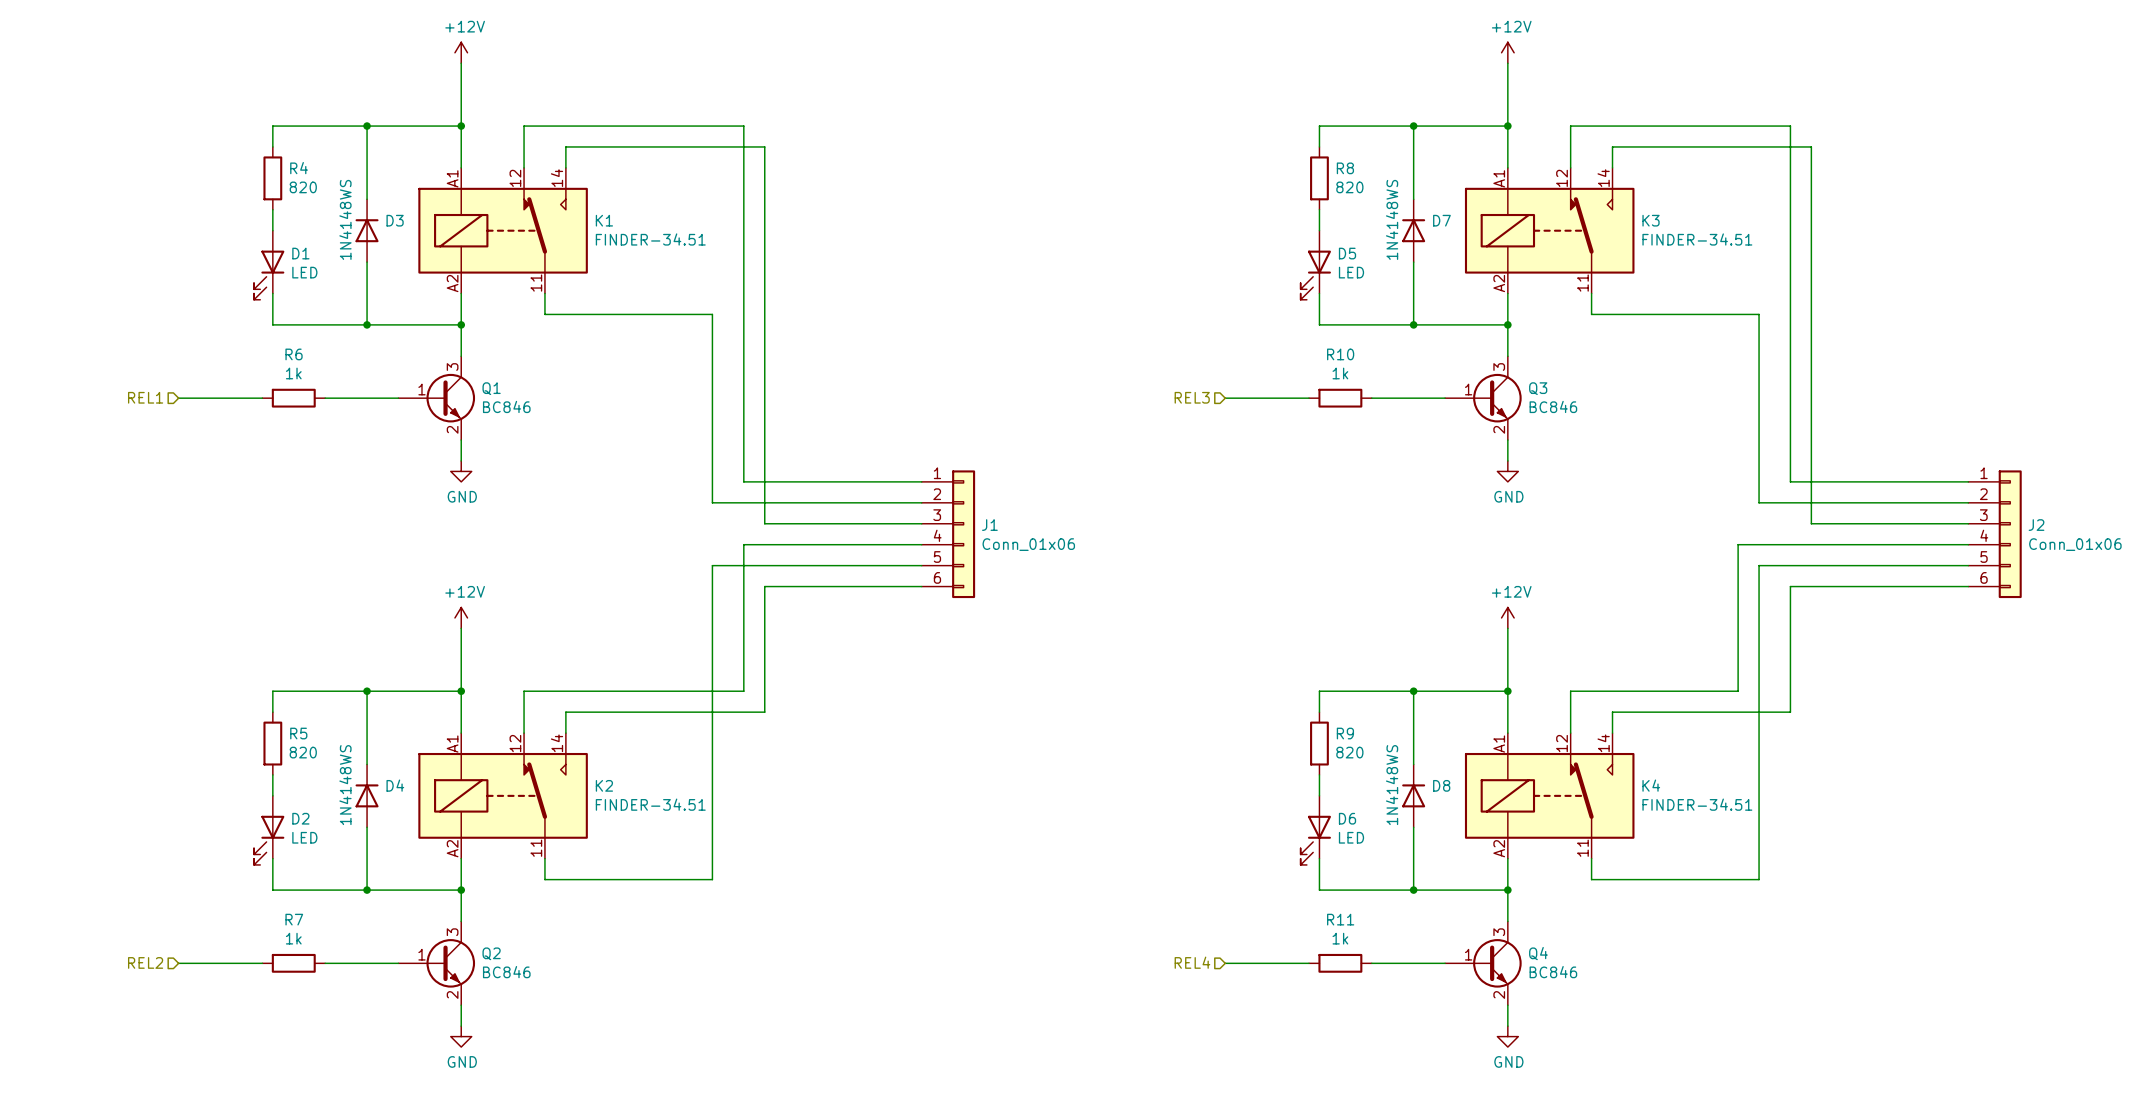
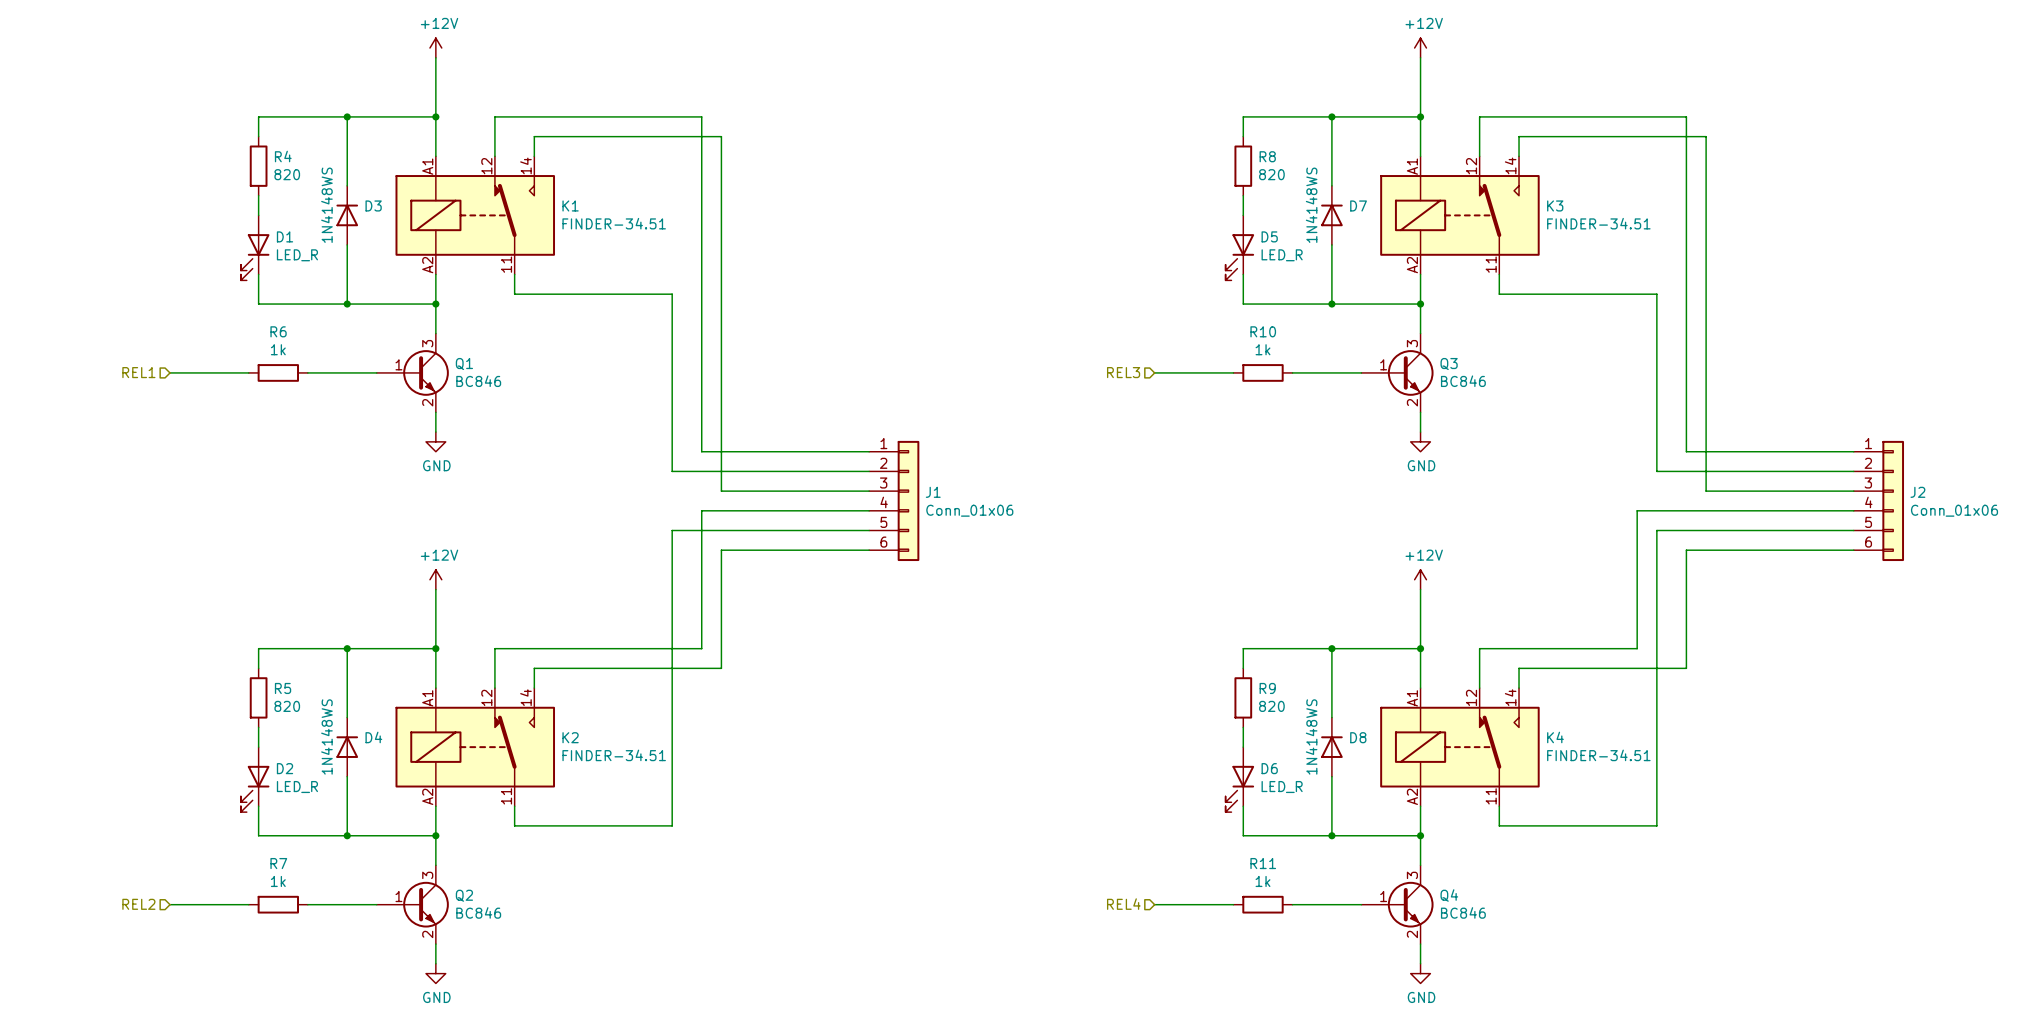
D1 value: LED (304, 272) -> LED_R (297, 255)
D5 value: LED (1351, 272) -> LED_R (1282, 255)
D2 value: LED (304, 837) -> LED_R (297, 787)
D6 value: LED (1351, 837) -> LED_R (1282, 787)

